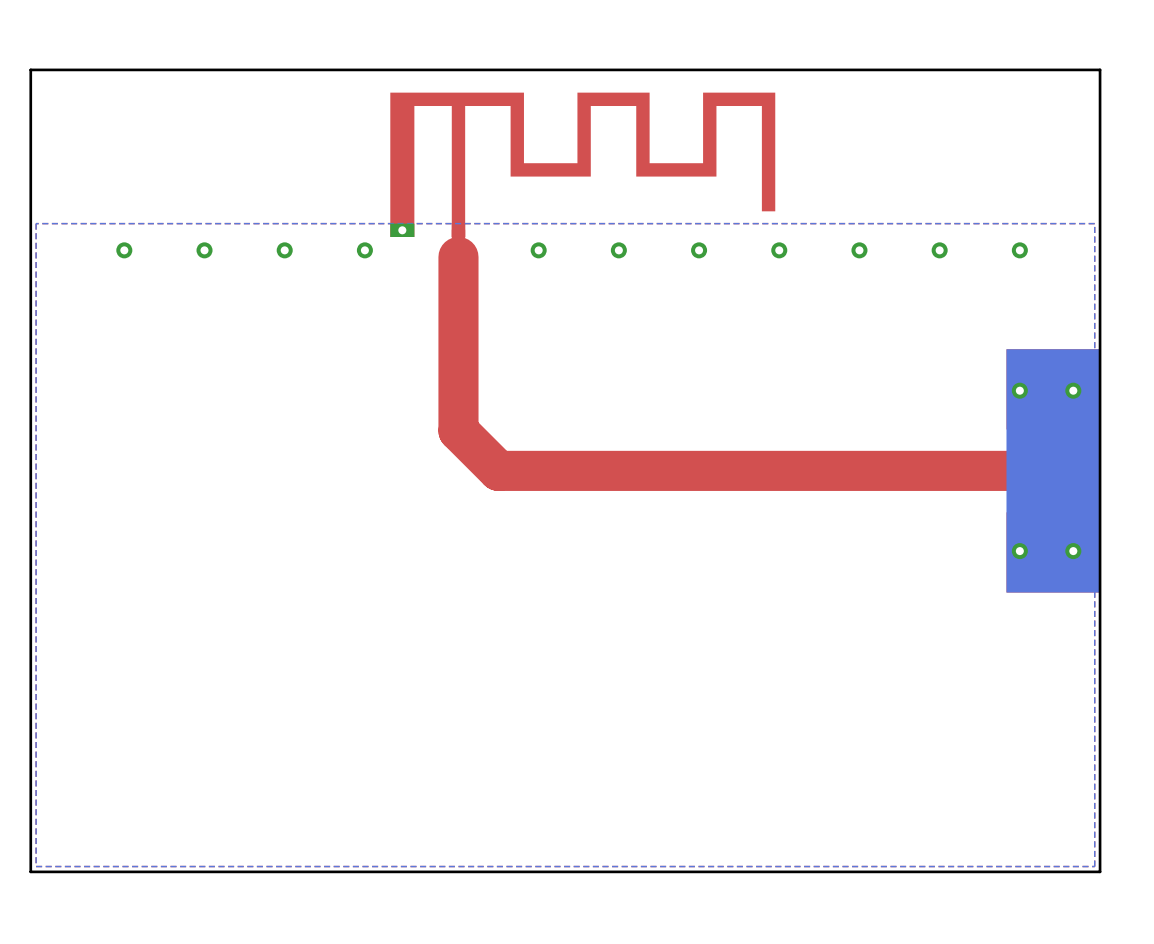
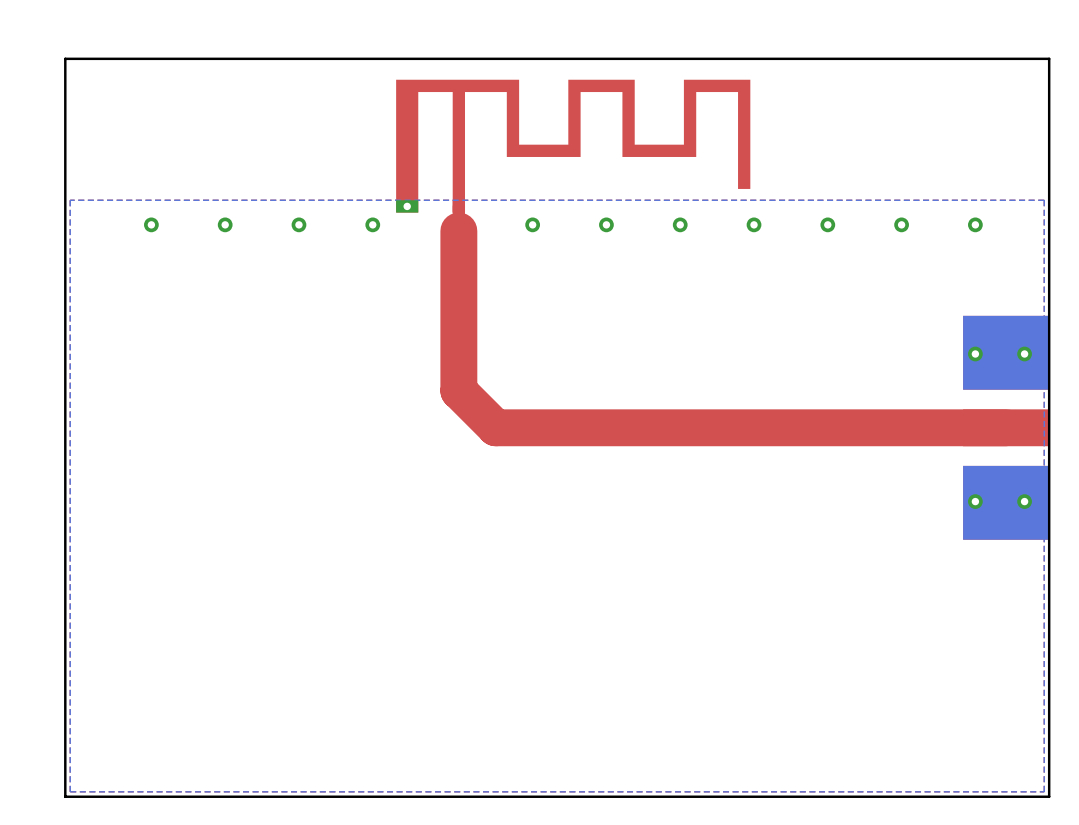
part footprint: [1006, 349, 1101, 593] -> [963, 315, 1050, 540]

